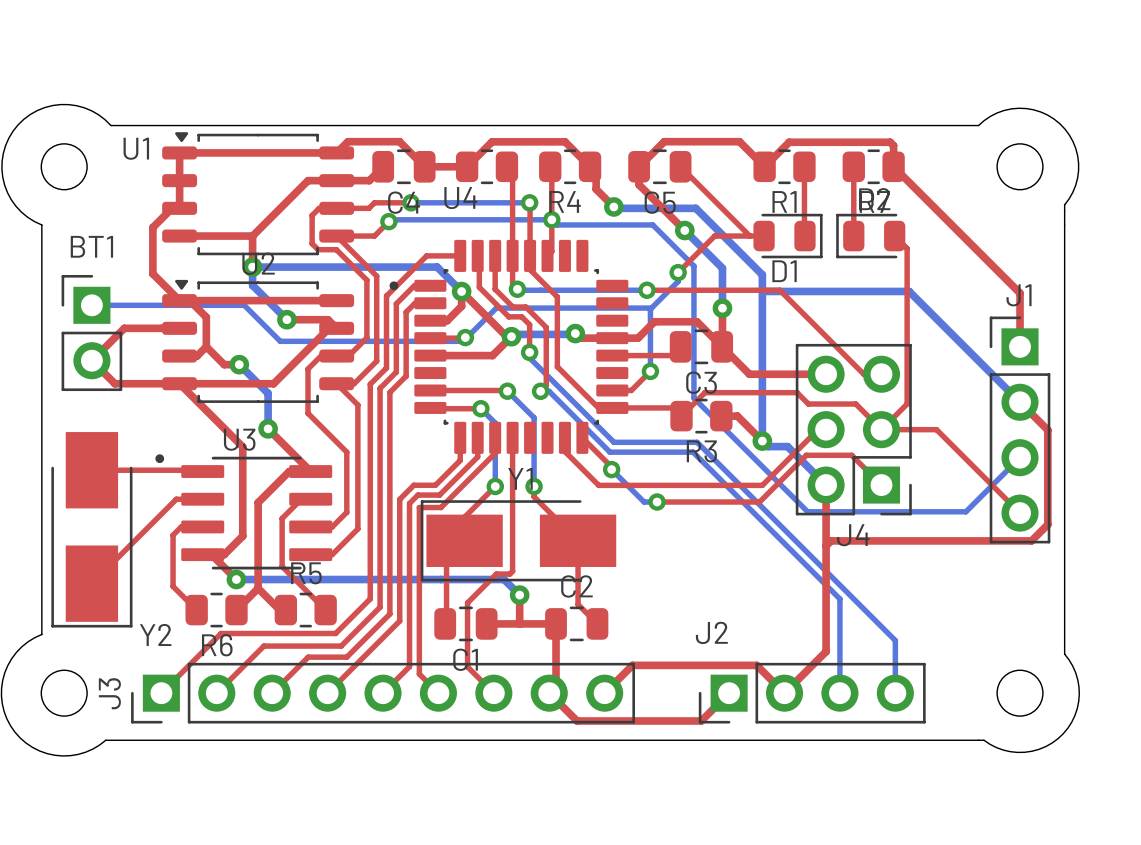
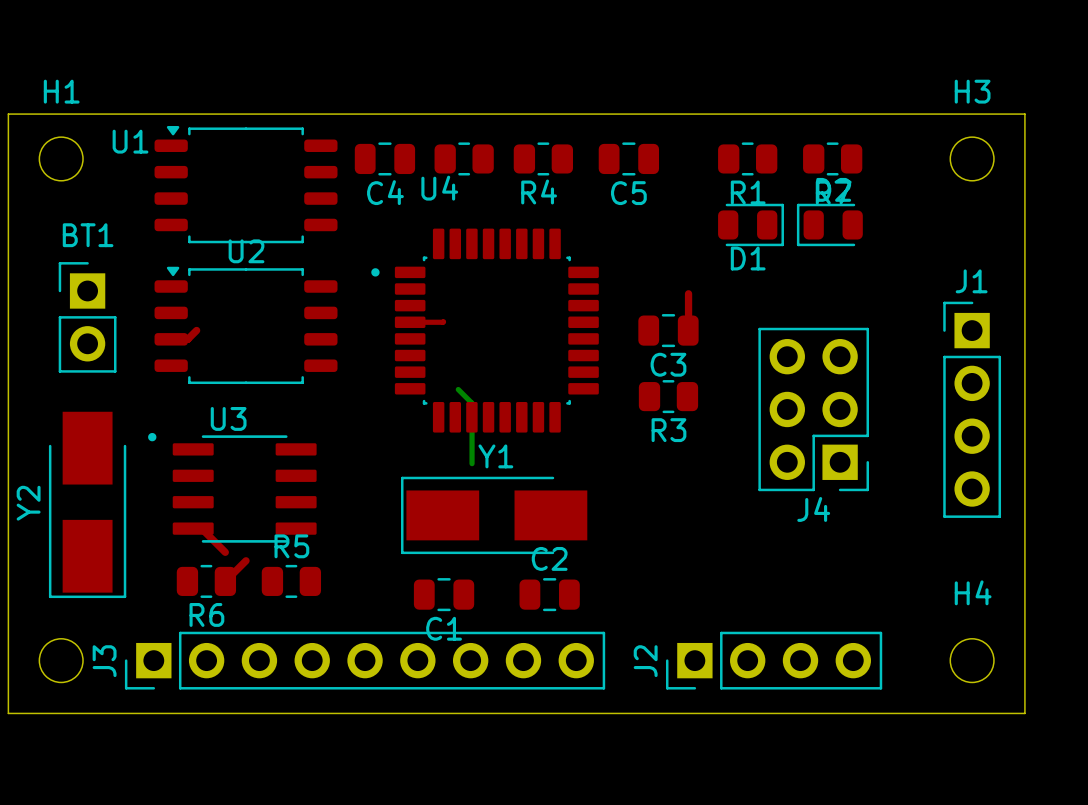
H1 name: none -> H1 (61, 91)
H3 name: none -> H3 (972, 91)
board edge: (978, 125) (110, 125) (91, 110) (68, 104) (52, 105) (30, 114) (18, 124) (8, 138) (3, 153) (1, 169) (4, 185) (15, 206) (27, 217) (41, 224) (41, 634) (28, 641) (16, 652) (4, 672) (1, 695) (4, 711) (10, 725) (20, 737) (32, 747) (47, 753) (62, 755) (85, 752) (105, 740) (984, 740) (1003, 750) (1017, 752) (1032, 751) (1052, 742) (1063, 733) (1071, 721) (1077, 708) (1079, 694) (1075, 672) (1064, 654) (1064, 204) (1075, 185) (1078, 163) (1075, 148) (1065, 129) (1054, 119) (1040, 112) (1026, 108) (1011, 108) (990, 116) (978, 125) -> (8, 114) (8, 713) (1024, 713) (1024, 114) (8, 114)
top track: (383, 166) (369, 180) (308, 180) (252, 236) -> none
top track: (506, 166) (512, 172) (512, 284) (517, 289) -> none
top track: (550, 166) (551, 168) (551, 251) (547, 255) -> none
top track: (590, 166) (565, 141) (492, 141) (467, 166) (424, 166) (399, 141) (347, 141) (336, 152) (179, 152) (179, 208) (172, 208) (152, 227) (152, 273) (179, 300) (336, 300) -> none
top track: (680, 166) (749, 236) -> none
top track: (804, 166) (804, 236) -> none
top track: (853, 166) (853, 236) -> none
top track: (596, 172) (596, 189) (613, 206) -> none
top track: (411, 202) (374, 202) (368, 208) (319, 208) (312, 215) (312, 243) (318, 249) (336, 249) (366, 280) (366, 337) (363, 341) -> none
bottom track: (411, 202) (529, 202) -> none
via: (411, 202) -> none
top track: (529, 202) (530, 269) (557, 296) (557, 366) (598, 407) (673, 407) (681, 416) (704, 392) (797, 392) (808, 404) (855, 404) (881, 429) -> none
via: (529, 202) -> none
bottom track: (613, 206) (695, 208) (762, 274) (762, 441) (767, 446) (787, 446) (826, 485) -> none
via: (613, 206) -> none
via: (551, 219) -> none
top track: (388, 221) (374, 236) (336, 236) (376, 276) (376, 361) (354, 383) (336, 383) (357, 404) (357, 528) (332, 554) (310, 554) -> none
bottom track: (388, 221) (390, 219) (551, 219) (556, 224) (652, 224) (693, 266) (693, 398) (807, 511) (965, 511) (1020, 457) -> none
via: (388, 221) -> none
top track: (684, 230) (639, 184) (639, 166) (664, 141) (739, 141) (764, 166) (789, 142) (890, 142) (893, 145) (893, 166) (1020, 293) (1020, 346) -> none
bottom track: (684, 230) (722, 268) (722, 308) -> none
via: (684, 230) -> none
top track: (179, 236) (252, 236) -> none
top track: (252, 236) (252, 267) -> none
top track: (764, 236) (714, 236) (678, 272) -> none
top track: (894, 236) (907, 248) (907, 404) (881, 429) -> none
top track: (460, 255) (426, 255) (386, 296) (386, 368) (370, 384) (370, 598) (335, 633) (221, 633) (161, 693) -> none
top track: (495, 255) (495, 289) (512, 307) (525, 307) (546, 327) (546, 385) (540, 391) -> none
top track: (479, 257) (479, 287) (508, 316) (521, 316) (529, 324) (529, 352) -> none
via: (252, 267) -> none
bottom track: (678, 272) (678, 281) (650, 309) (650, 371) (651, 370) -> none
via: (678, 272) -> none
top track: (430, 285) (414, 285) (396, 303) (396, 372) (380, 388) (380, 607) (341, 646) (263, 646) (216, 693) -> none
bottom track: (517, 289) (647, 290) -> none
via: (517, 289) -> none
top track: (647, 290) (779, 290) (863, 374) (881, 374) -> none
via: (647, 290) -> none
bottom track: (762, 290) (909, 291) (1020, 402) -> none
bottom track: (461, 291) (437, 267) (252, 267) (252, 285) (286, 319) -> none
via: (461, 291) -> none
top track: (189, 300) (206, 317) (206, 346) (224, 364) (239, 364) -> none
top track: (430, 303) (415, 303) (406, 312) (406, 376) (389, 392) (389, 614) (346, 657) (308, 657) (272, 693) -> none
bottom track: (91, 305) (244, 305) (280, 341) (461, 341) (496, 308) (651, 308) -> none
via: (722, 308) -> none
top track: (286, 319) (328, 319) (336, 328) (329, 328) (273, 383) (114, 383) (91, 360) (124, 328) (179, 328) -> none
via: (286, 319) -> none
top track: (430, 320) (447, 320) (461, 306) (461, 291) (506, 336) (511, 336) (492, 355) (430, 355) -> none
top track: (575, 333) (579, 338) (638, 338) (654, 321) (697, 321) (749, 374) (826, 374) -> none
bottom track: (575, 333) (513, 334) (511, 336) -> none
via: (575, 333) -> none
via: (511, 336) -> none
via: (465, 337) -> none
top track: (362, 342) (348, 356) (321, 356) (308, 369) (308, 413) (346, 452) (346, 512) (332, 526) (310, 526) -> none
top track: (680, 346) (671, 355) (612, 355) -> none
bottom track: (529, 352) (529, 357) (614, 442) (697, 442) (895, 640) (895, 693) -> none
via: (529, 352) -> none
bottom track: (239, 364) (268, 393) (268, 428) -> none
via: (239, 364) -> none
top track: (650, 371) (631, 390) (612, 390) -> none
via: (650, 371) -> none
top track: (179, 383) (242, 446) (242, 536) (224, 554) (202, 554) -> none
top track: (430, 390) (507, 391) -> none
bottom track: (507, 391) (534, 417) (534, 486) -> none
via: (507, 391) -> none
bottom track: (540, 391) (549, 391) (609, 452) (693, 452) (839, 599) (839, 693) -> none
via: (540, 391) -> none
top track: (1020, 402) (1047, 430) (1047, 524) (1031, 540) (831, 540) (826, 545) -> none
top track: (430, 407) (480, 408) -> none
via: (480, 408) -> none
top track: (721, 416) (737, 416) (762, 441) -> none
top track: (268, 428) (310, 471) (289, 471) (258, 502) (258, 588) (279, 610) (285, 610) -> none
via: (268, 428) -> none
top track: (826, 429) (818, 429) (762, 485) (598, 485) (564, 451) (564, 437) -> none
top track: (881, 429) (936, 429) (1020, 513) -> none
top track: (460, 437) (460, 460) (435, 485) (413, 485) (399, 499) (399, 621) (327, 693) -> none
top track: (477, 437) (477, 456) (439, 495) (417, 495) (409, 503) (409, 666) (383, 693) -> none
top track: (495, 437) (495, 453) (441, 507) (419, 507) (419, 674) (438, 693) -> none
top track: (512, 437) (512, 571) (509, 574) (496, 574) (467, 602) (467, 666) (493, 693) -> none
top track: (582, 437) (611, 467) (611, 469) -> none
via: (762, 441) -> none
bottom track: (611, 469) (644, 502) (657, 502) -> none
via: (611, 469) -> none
top track: (91, 470) (202, 471) -> none
top track: (826, 485) (826, 651) (784, 693) (756, 665) (632, 665) (604, 693) -> none
top track: (881, 485) (851, 455) (806, 455) (759, 502) (657, 502) -> none
top track: (495, 486) (464, 517) (464, 540) (446, 558) (445, 623) -> none
via: (495, 486) -> none
top track: (534, 486) (534, 496) (578, 540) (578, 604) (597, 623) -> none
via: (534, 486) -> none
top track: (202, 499) (176, 499) (91, 583) -> none
top track: (310, 499) (301, 499) (282, 518) (282, 566) (325, 610) -> none
via: (657, 502) -> none
top track: (202, 526) (181, 526) (173, 535) (173, 586) (196, 610) -> none
bottom track: (236, 579) (504, 579) (519, 595) -> none
via: (236, 579) -> none
top track: (519, 595) (519, 623) -> none
via: (519, 595) -> none
H4 name: none -> H4 (973, 592)
top track: (486, 623) (556, 623) (556, 686) (549, 693) (577, 720) (701, 720) (729, 693) -> none
J2 name rotation: 0° (711, 632) -> 90° counterclockwise (645, 661)
J2 name position: J2 (711, 632) -> J2 (645, 661)
Y2 name rotation: 0° (155, 634) -> 90° counterclockwise (28, 503)
Y2 name position: Y2 (155, 634) -> Y2 (28, 503)

